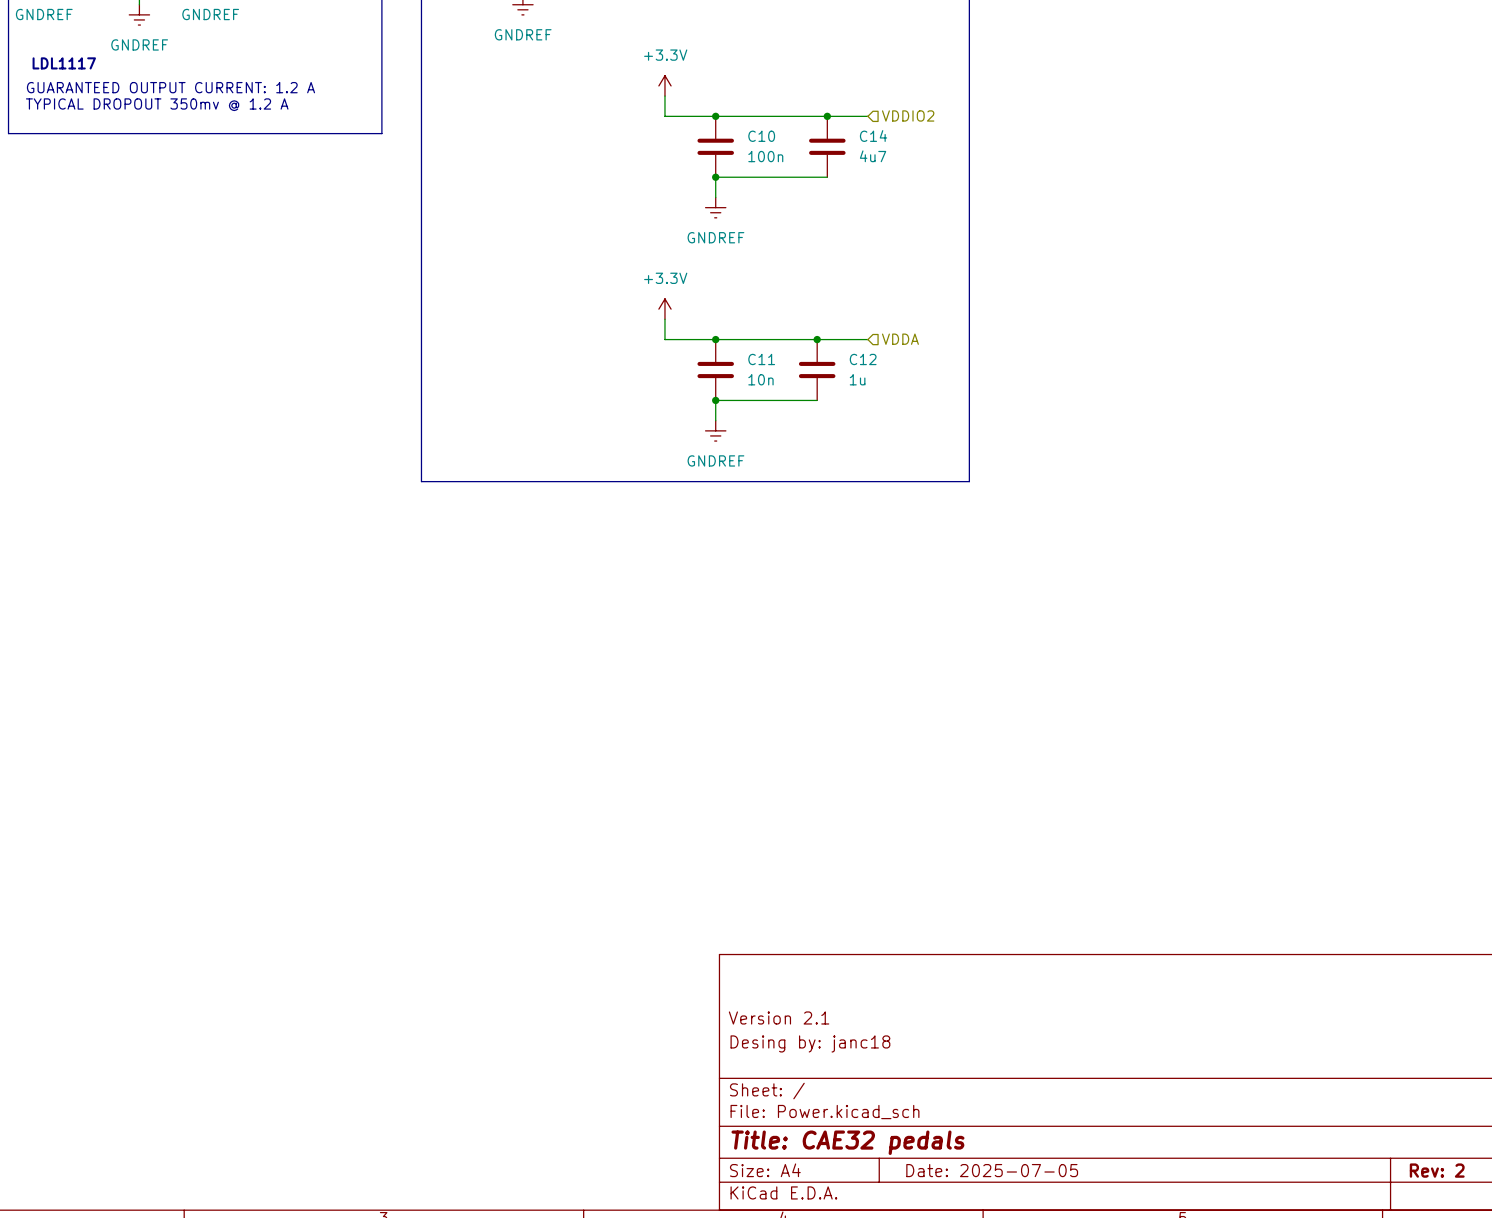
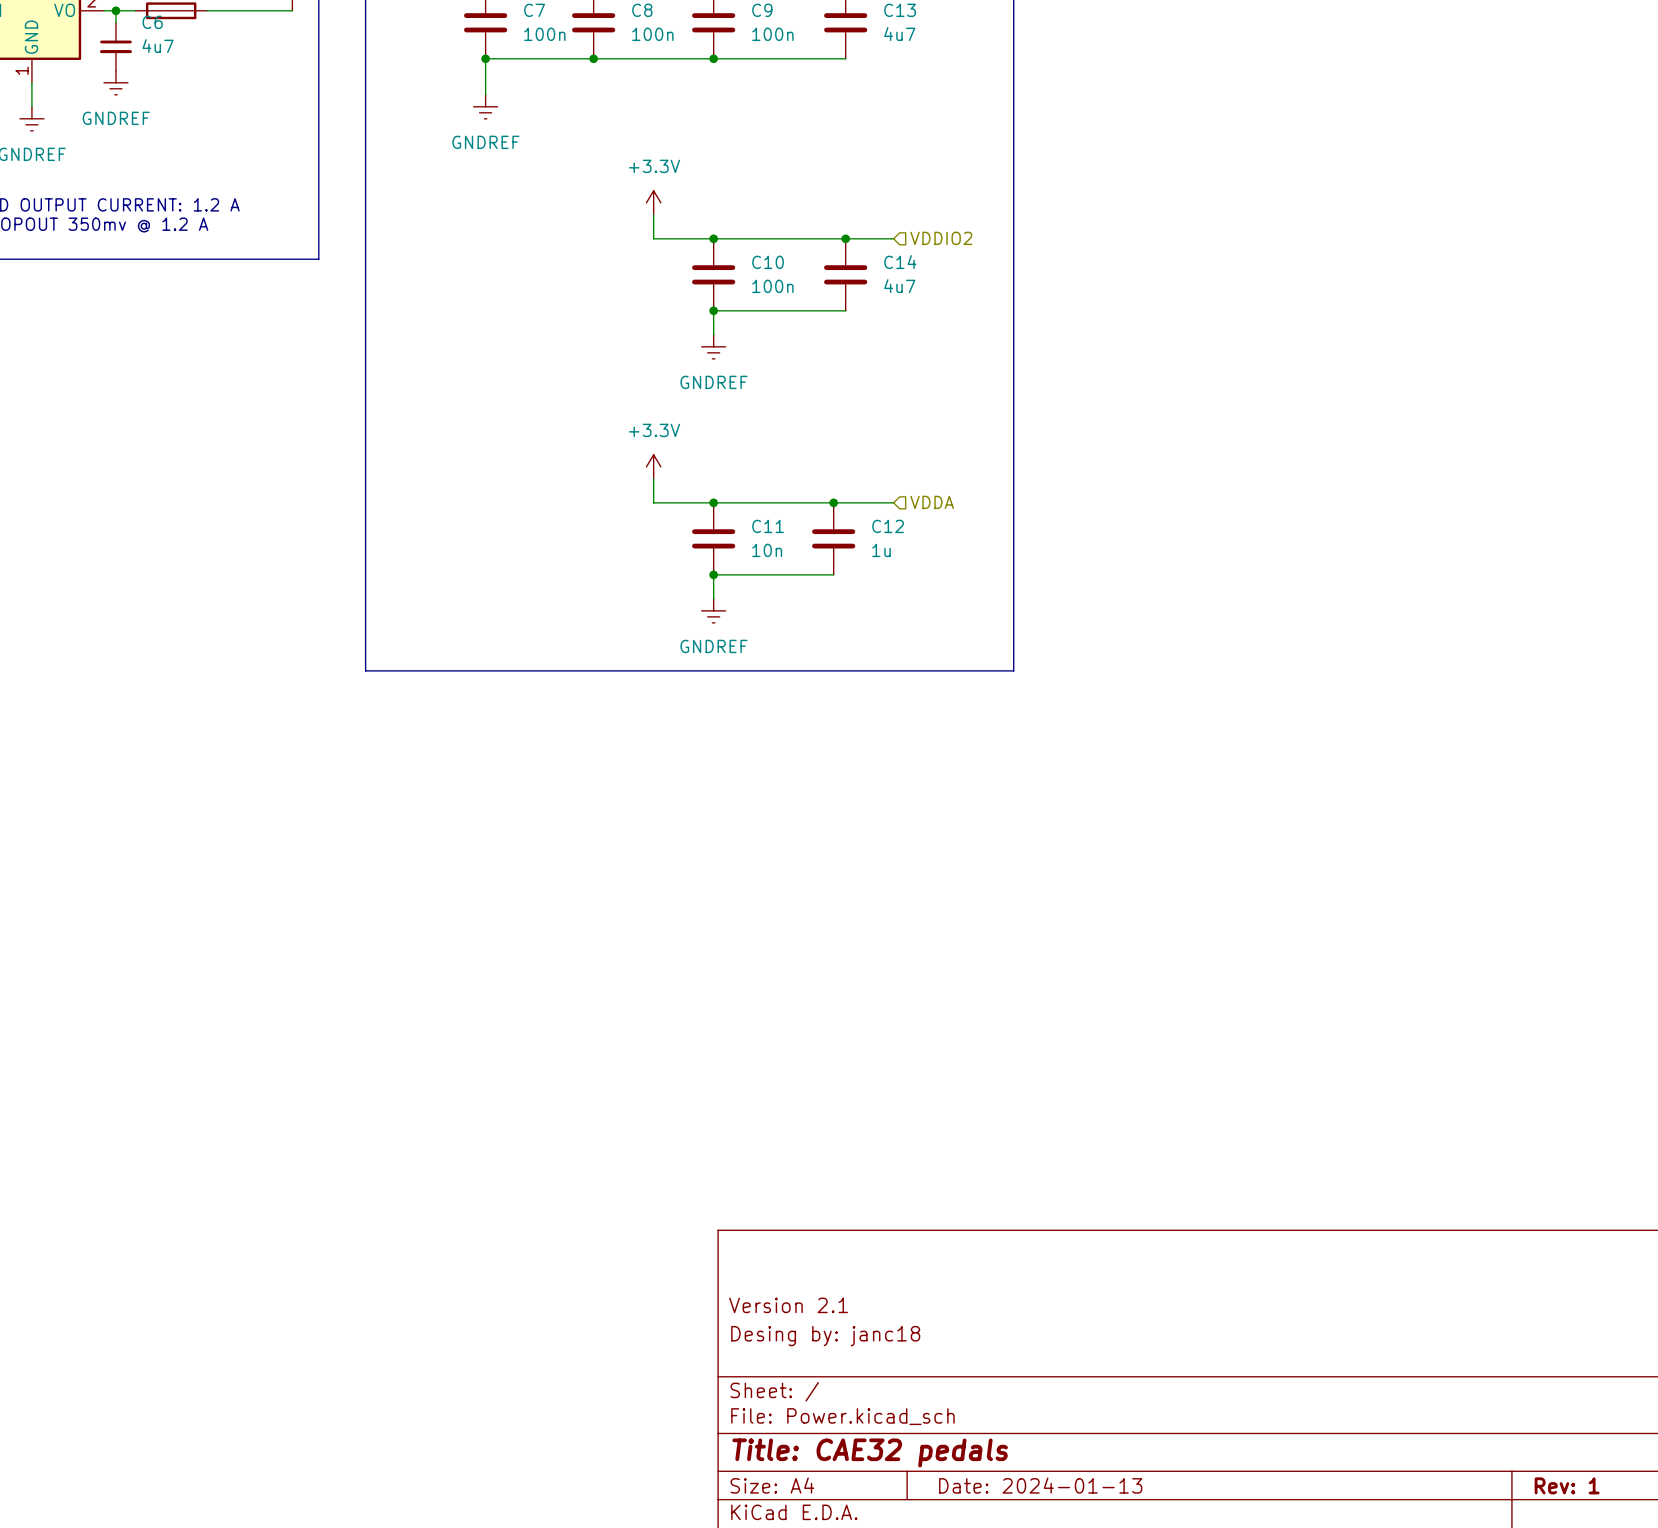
title block: Date: 2025-07-05 (992, 1170) -> Date: 2024-01-13 (1040, 1485)
title block: Rev: 2 (1437, 1170) -> Rev: 1 (1567, 1485)

